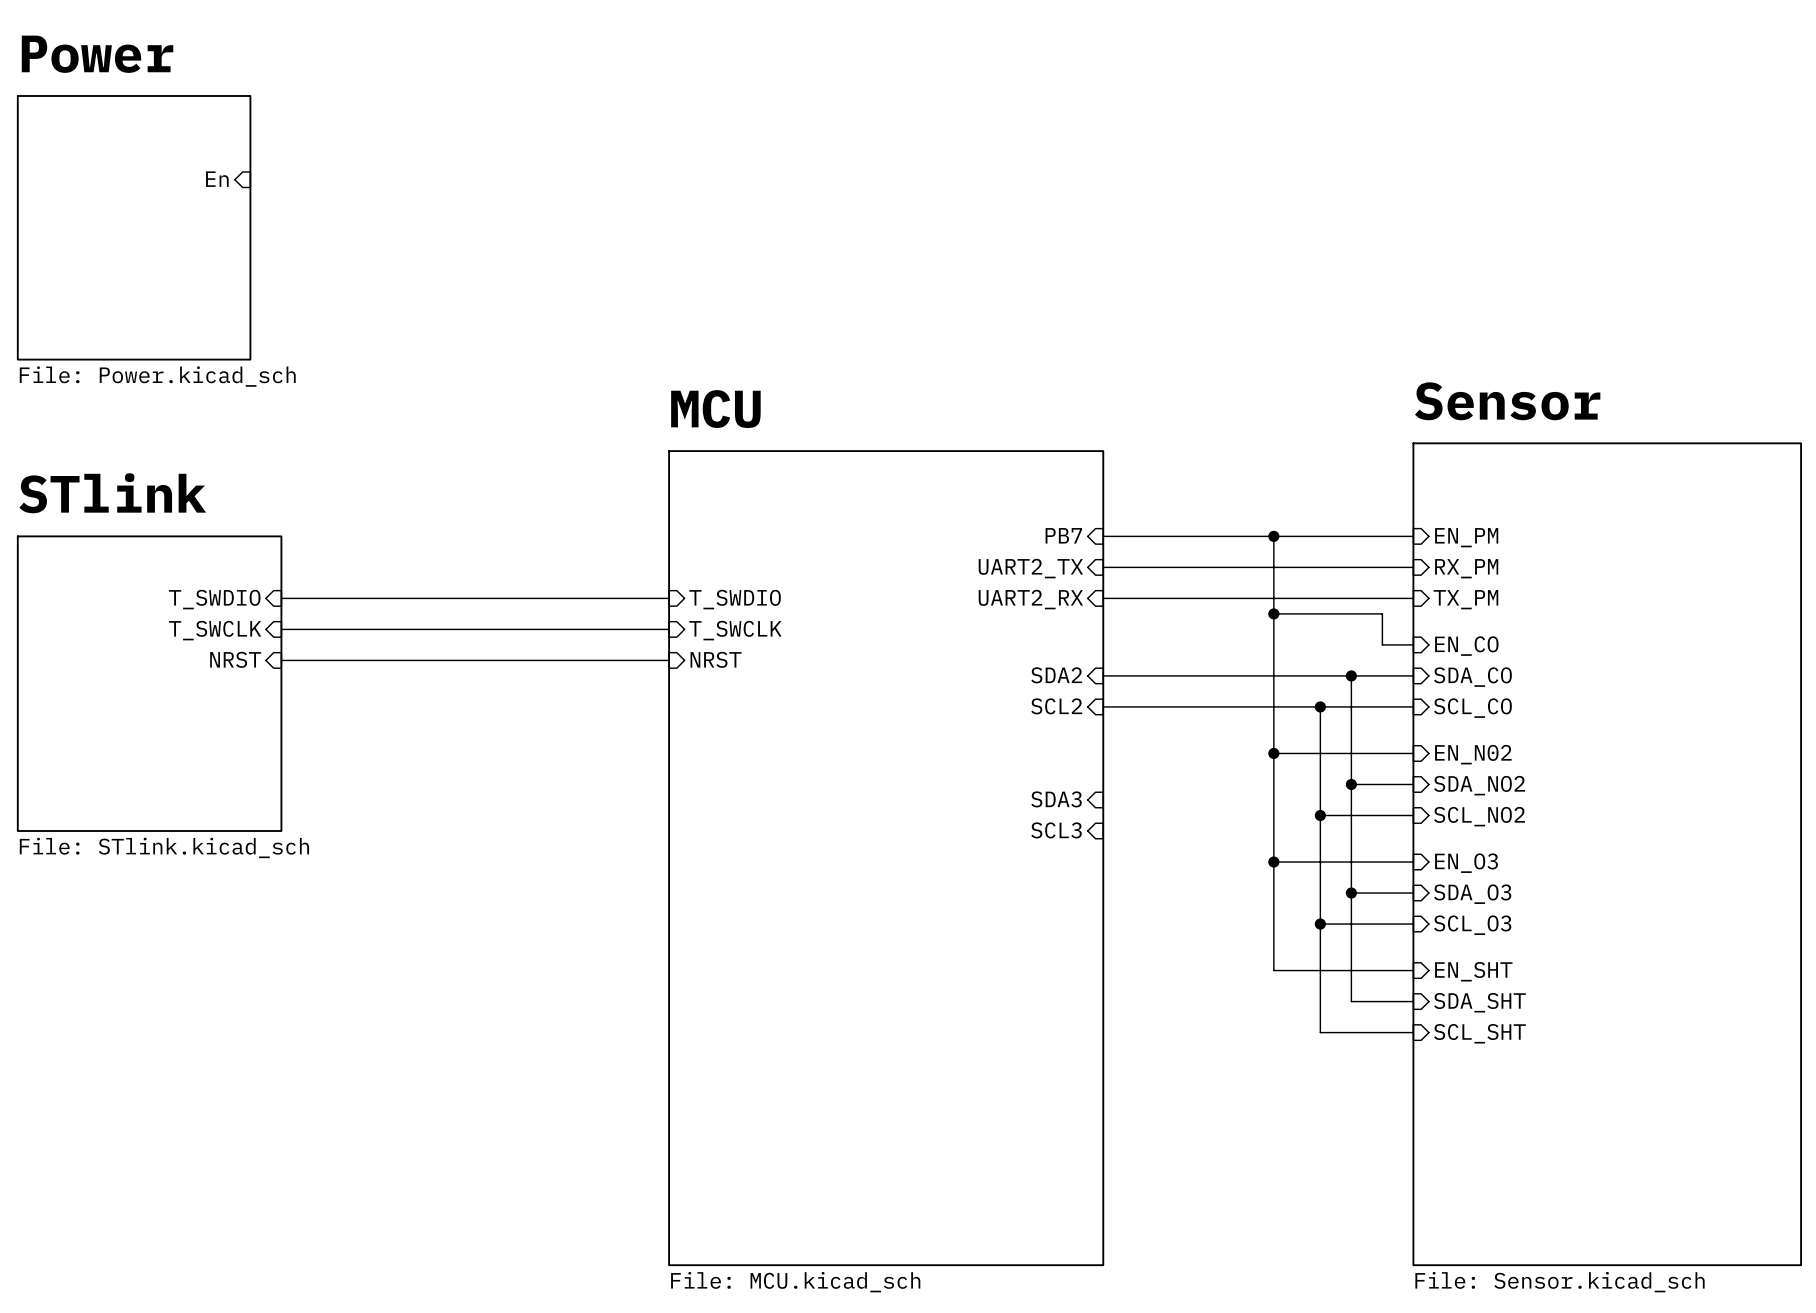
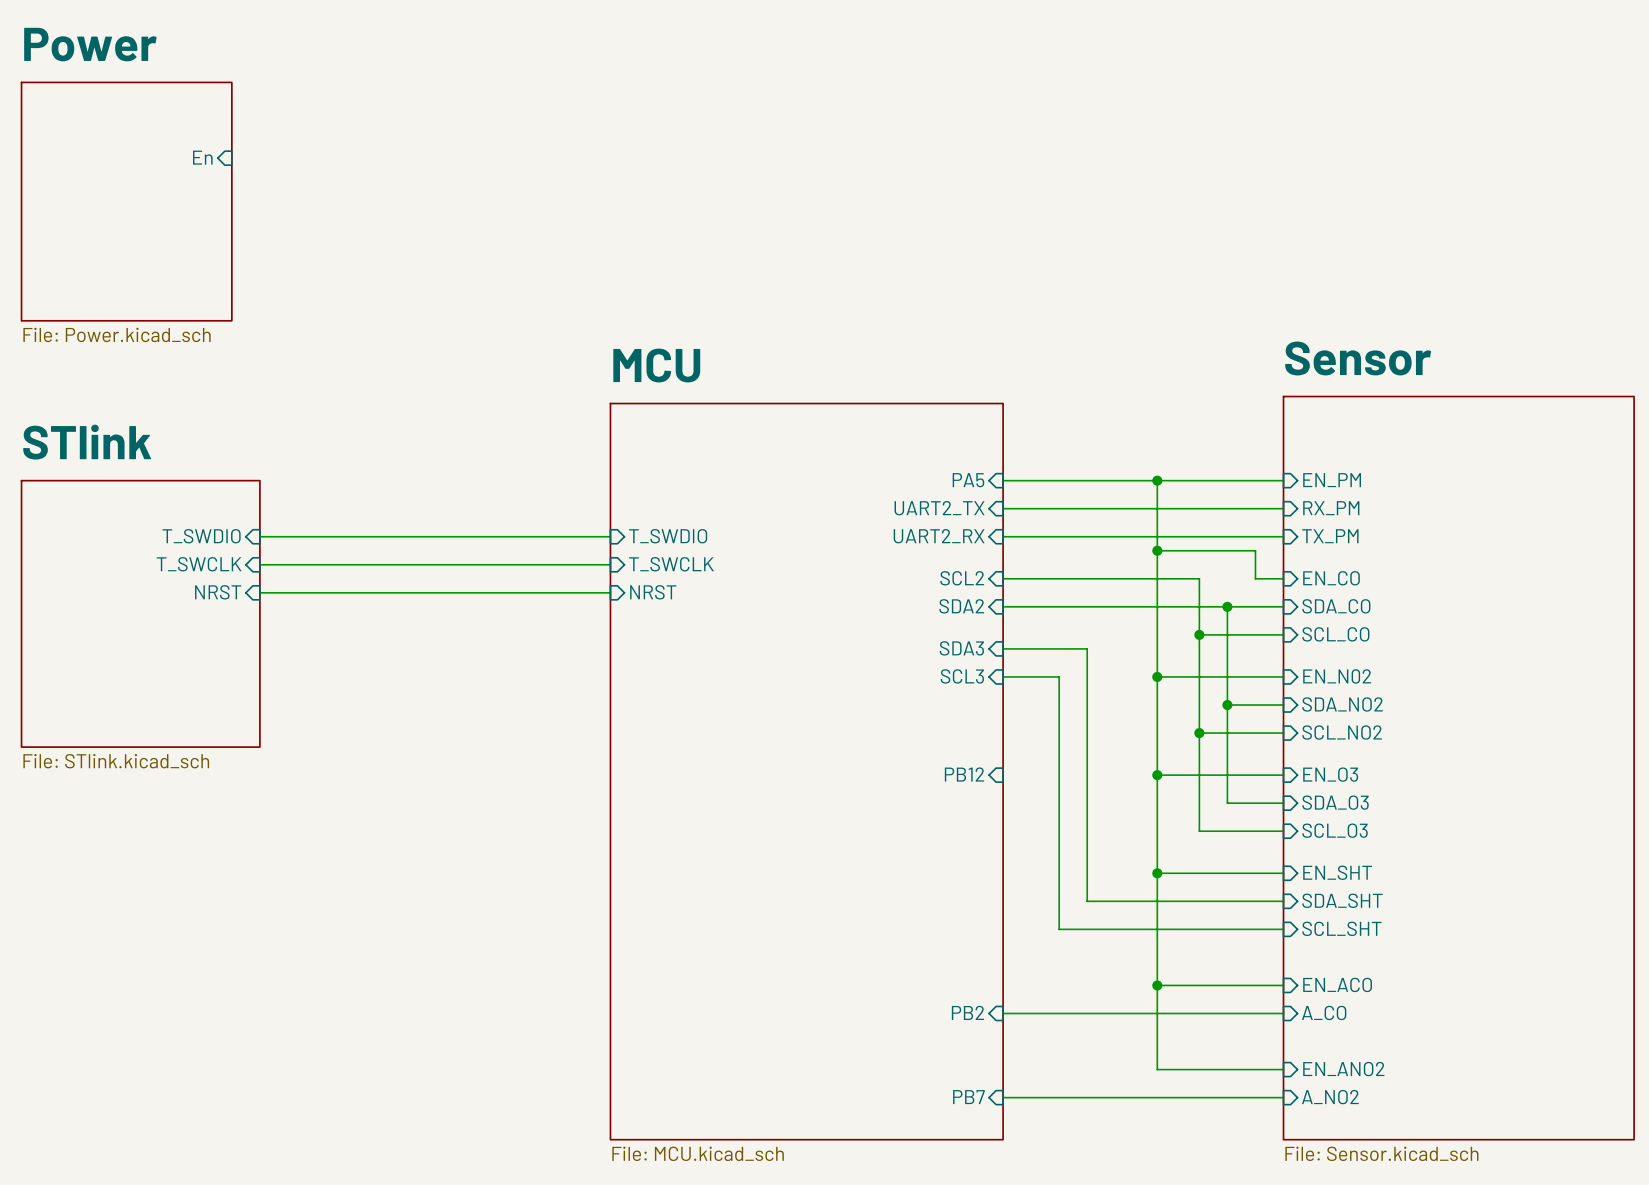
sheet pin: PB7 (1063, 535) -> PA5 (968, 480)
sheet pin position: SCL2 (1056, 706) -> SCL2 (962, 578)
wire: (1103, 706) (1320, 706) -> (1003, 578) (1199, 578) (1199, 634)
sheet pin position: SDA3 (1056, 799) -> SDA3 (961, 648)
sheet pin position: SCL3 (1056, 830) -> SCL3 (962, 676)
sheet pin: none -> PB12 (964, 774)
wire: (1351, 893) (1351, 1001) -> (1003, 648) (1087, 648) (1087, 901) (1227, 901)
junction: (1351, 893) -> none
wire: (1320, 924) (1320, 1032) -> (1003, 676) (1059, 676) (1059, 929) (1199, 929)
junction: (1320, 924) -> none
wire: none -> (1157, 873) (1157, 1069) (1283, 1069)
junction: none -> (1157, 873)
wire: none -> (1157, 985) (1283, 985)
junction: none -> (1157, 985)
sheet pin: none -> EN_ACO (1337, 984)
sheet pin: none -> PB2 (967, 1012)
wire: none -> (1003, 1013) (1283, 1013)
sheet pin: none -> A_CO (1324, 1012)
sheet pin: none -> EN_ANO2 (1343, 1069)
sheet pin: none -> PB7 (968, 1097)
wire: none -> (1003, 1097) (1283, 1097)
sheet pin: none -> A_NO2 (1330, 1097)

